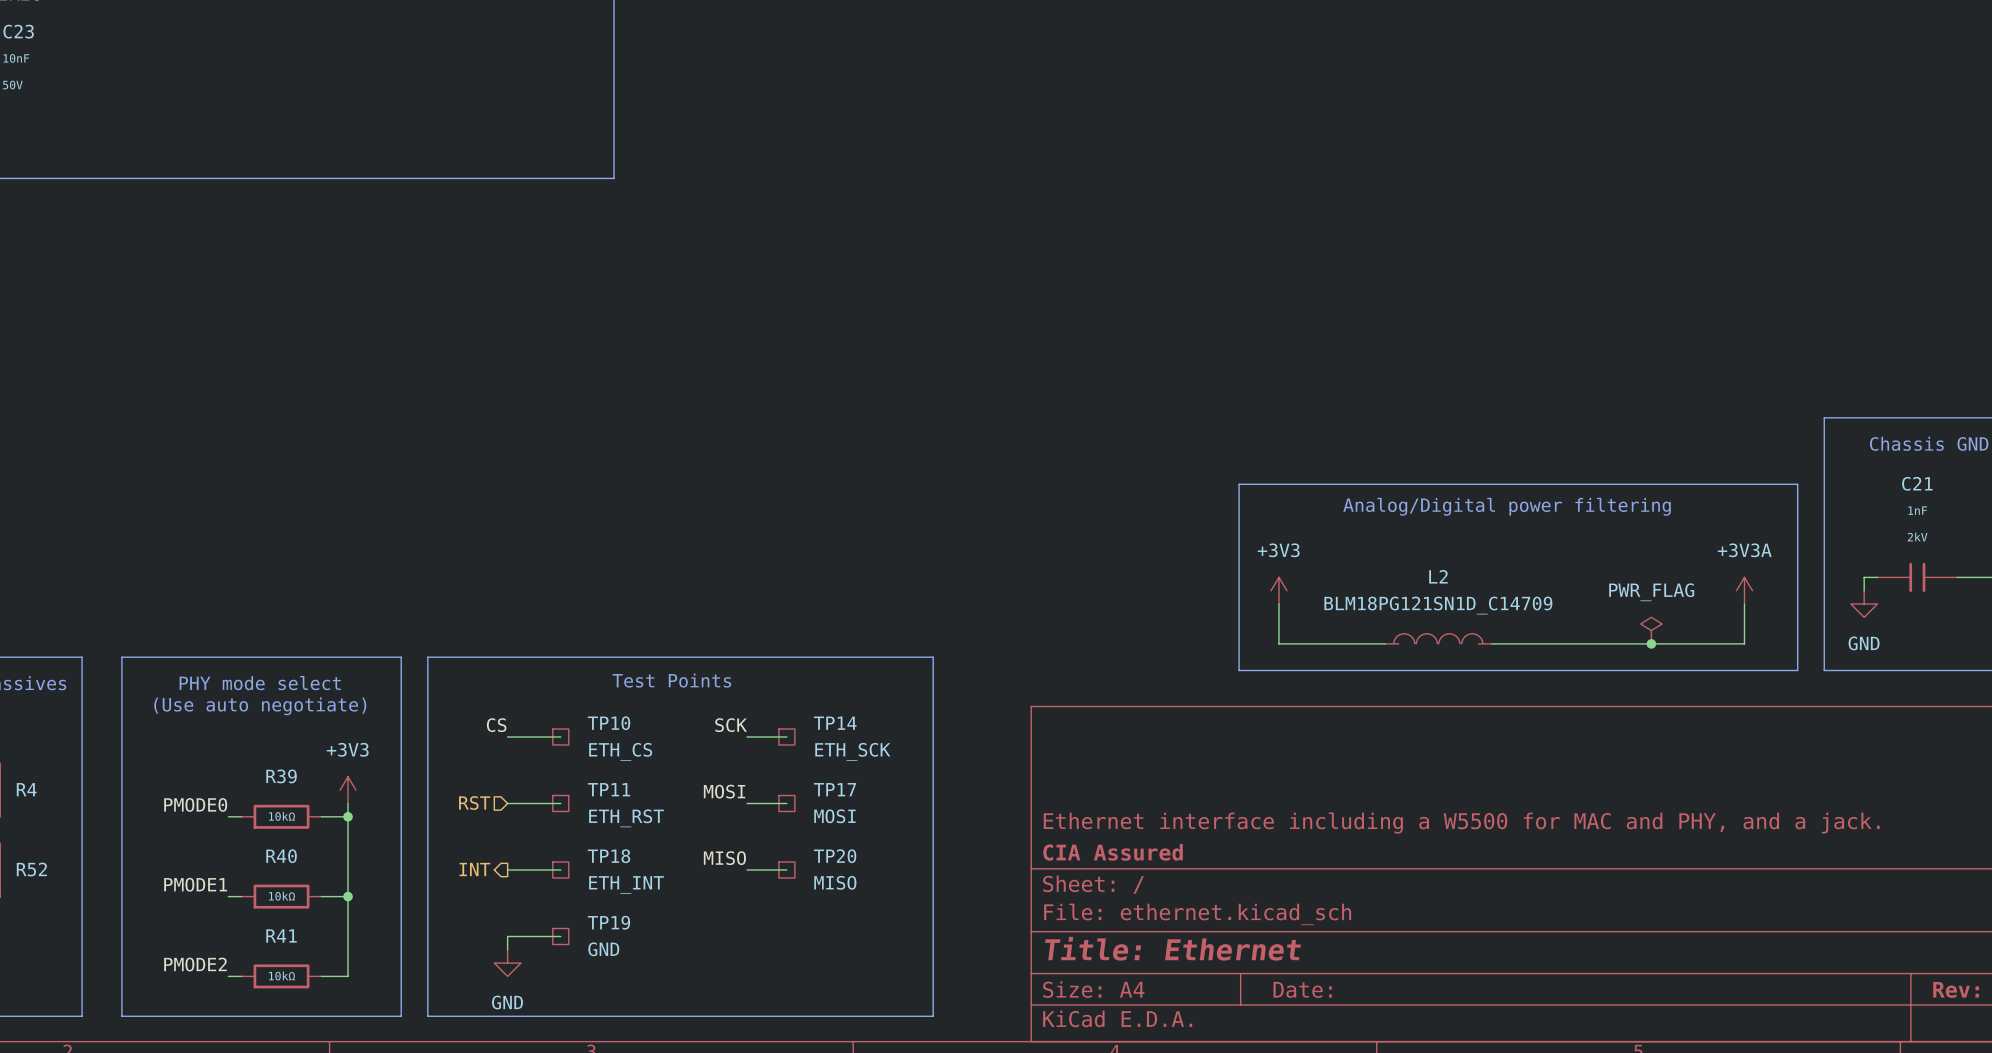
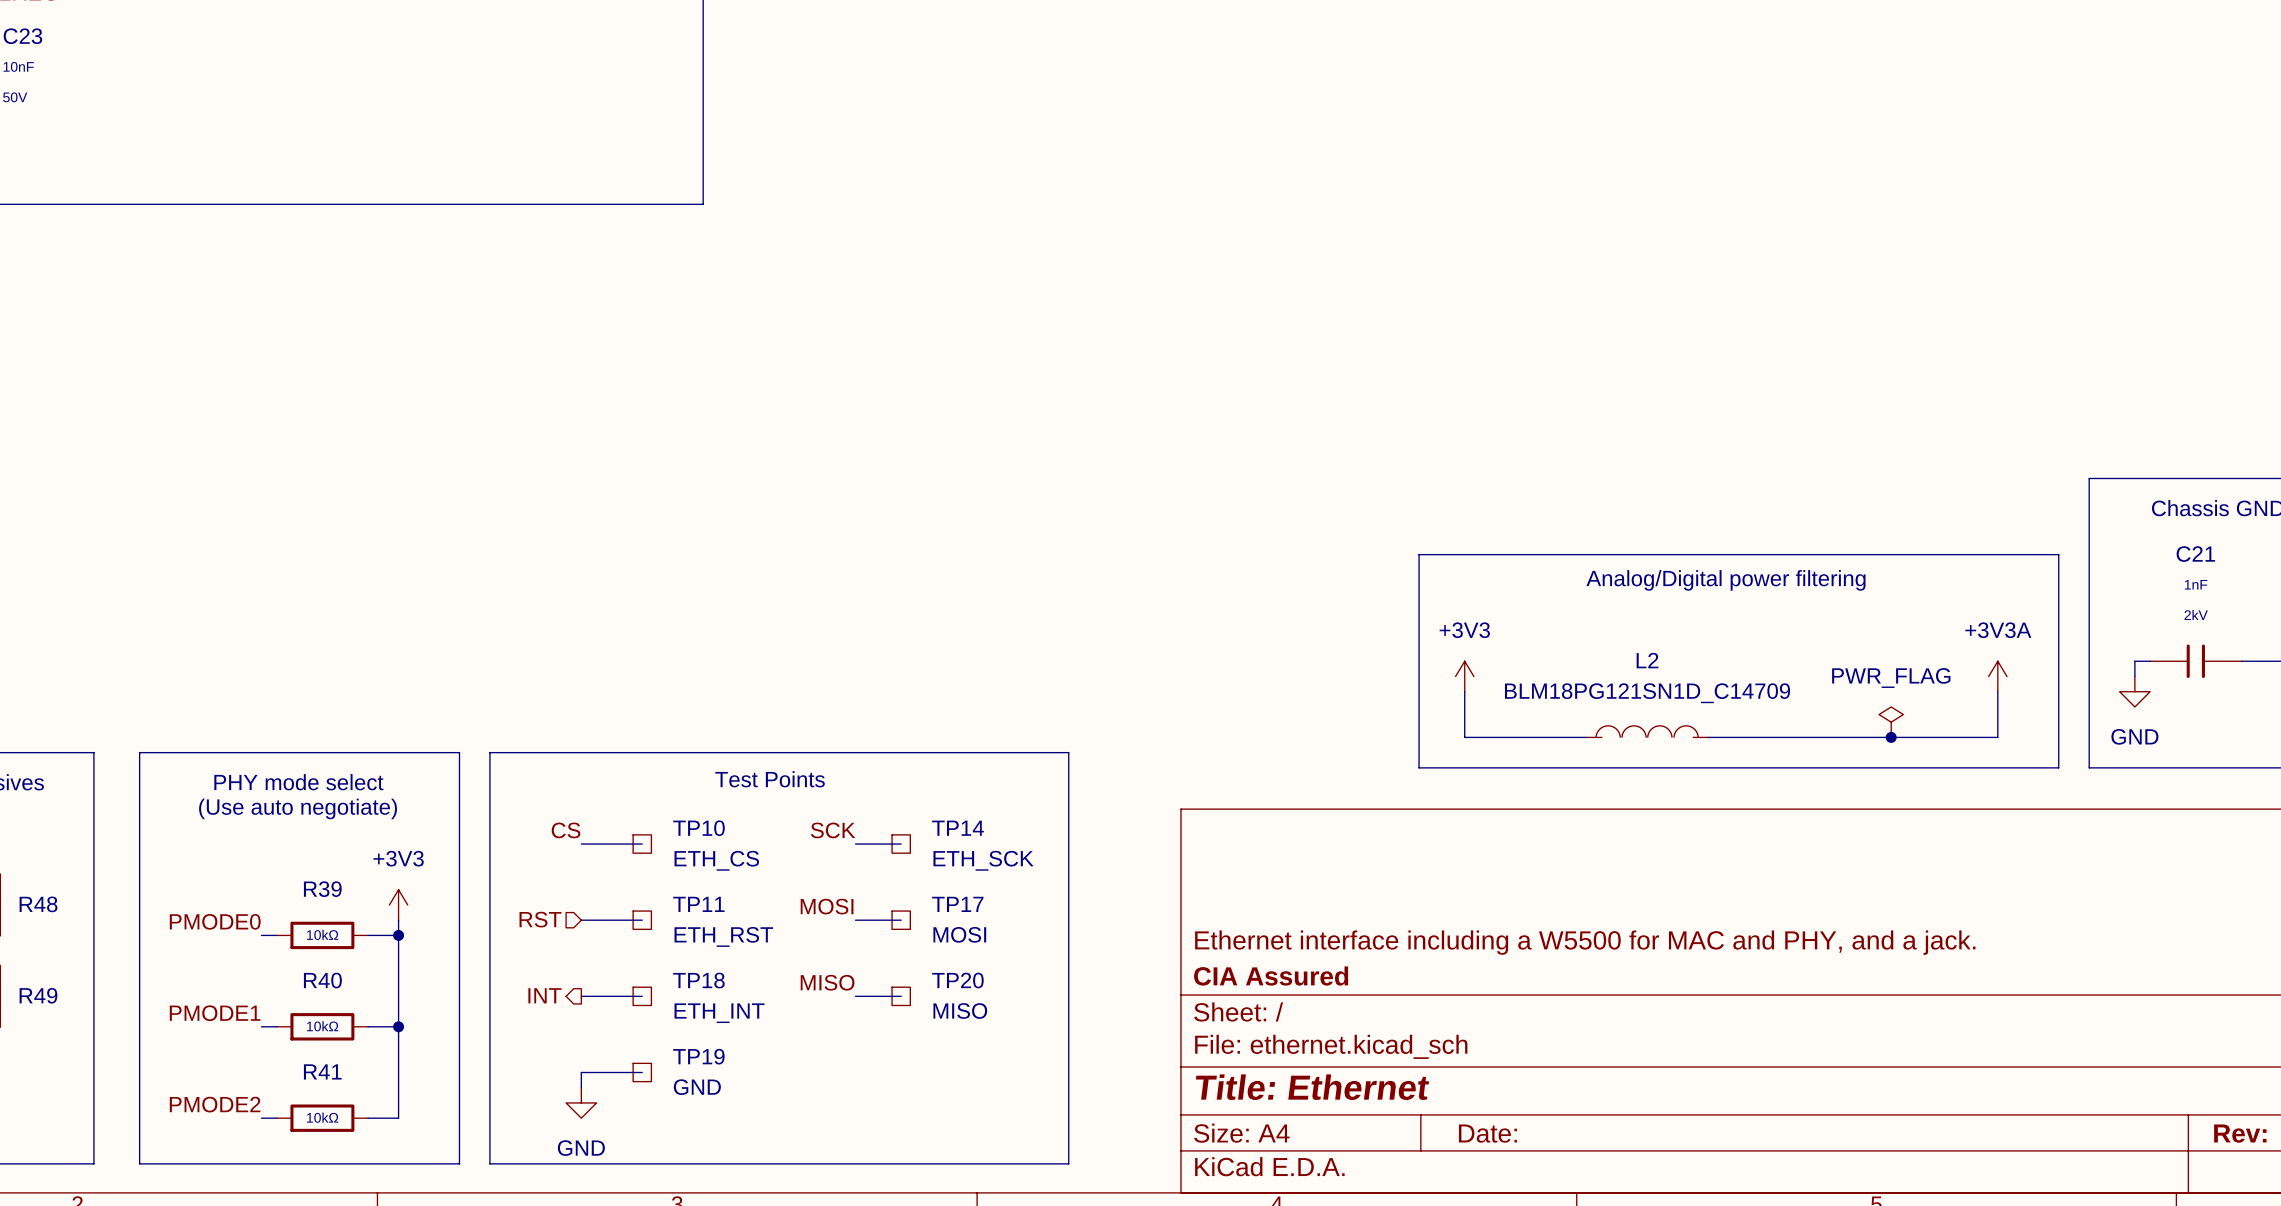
R4 name: R4 (26, 789) -> R48 (38, 904)
R52 name: R52 (31, 869) -> R49 (38, 995)

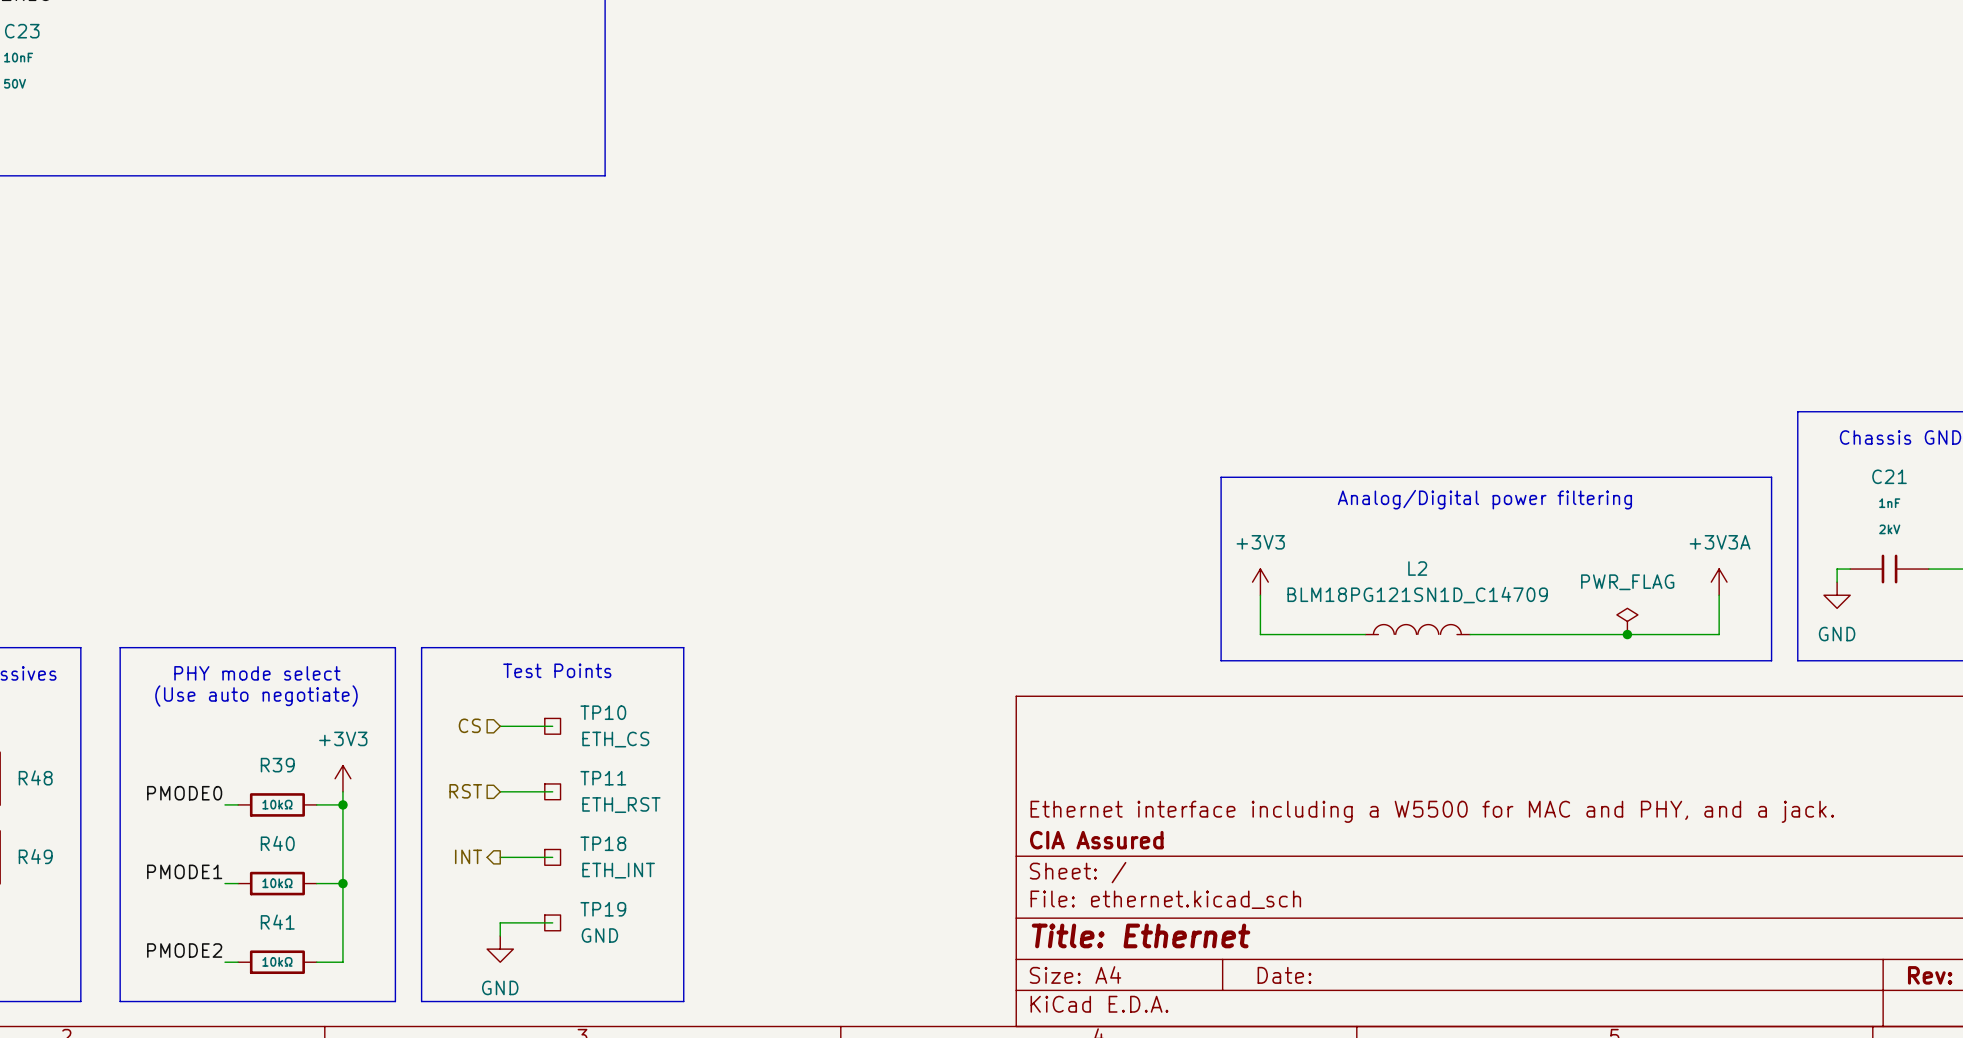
line: (794, 752) (1068, 752) (1068, 1163) (794, 1163) -> (683, 647) (683, 1001)
text position: Test Points (770, 779) -> Test Points (557, 670)
label: CS (566, 830) -> none
label: SCK (833, 830) -> none
hierarchical label: none -> CS (469, 725)
wire: (855, 844) (901, 844) -> none
TP14: ETH_SCK (901, 844) -> none
label: MOSI (827, 906) -> none
wire: (855, 920) (901, 920) -> none
TP17: MOSI (901, 920) -> none
label: MISO (827, 982) -> none
wire: (855, 996) (901, 996) -> none
TP20: MISO (901, 996) -> none

